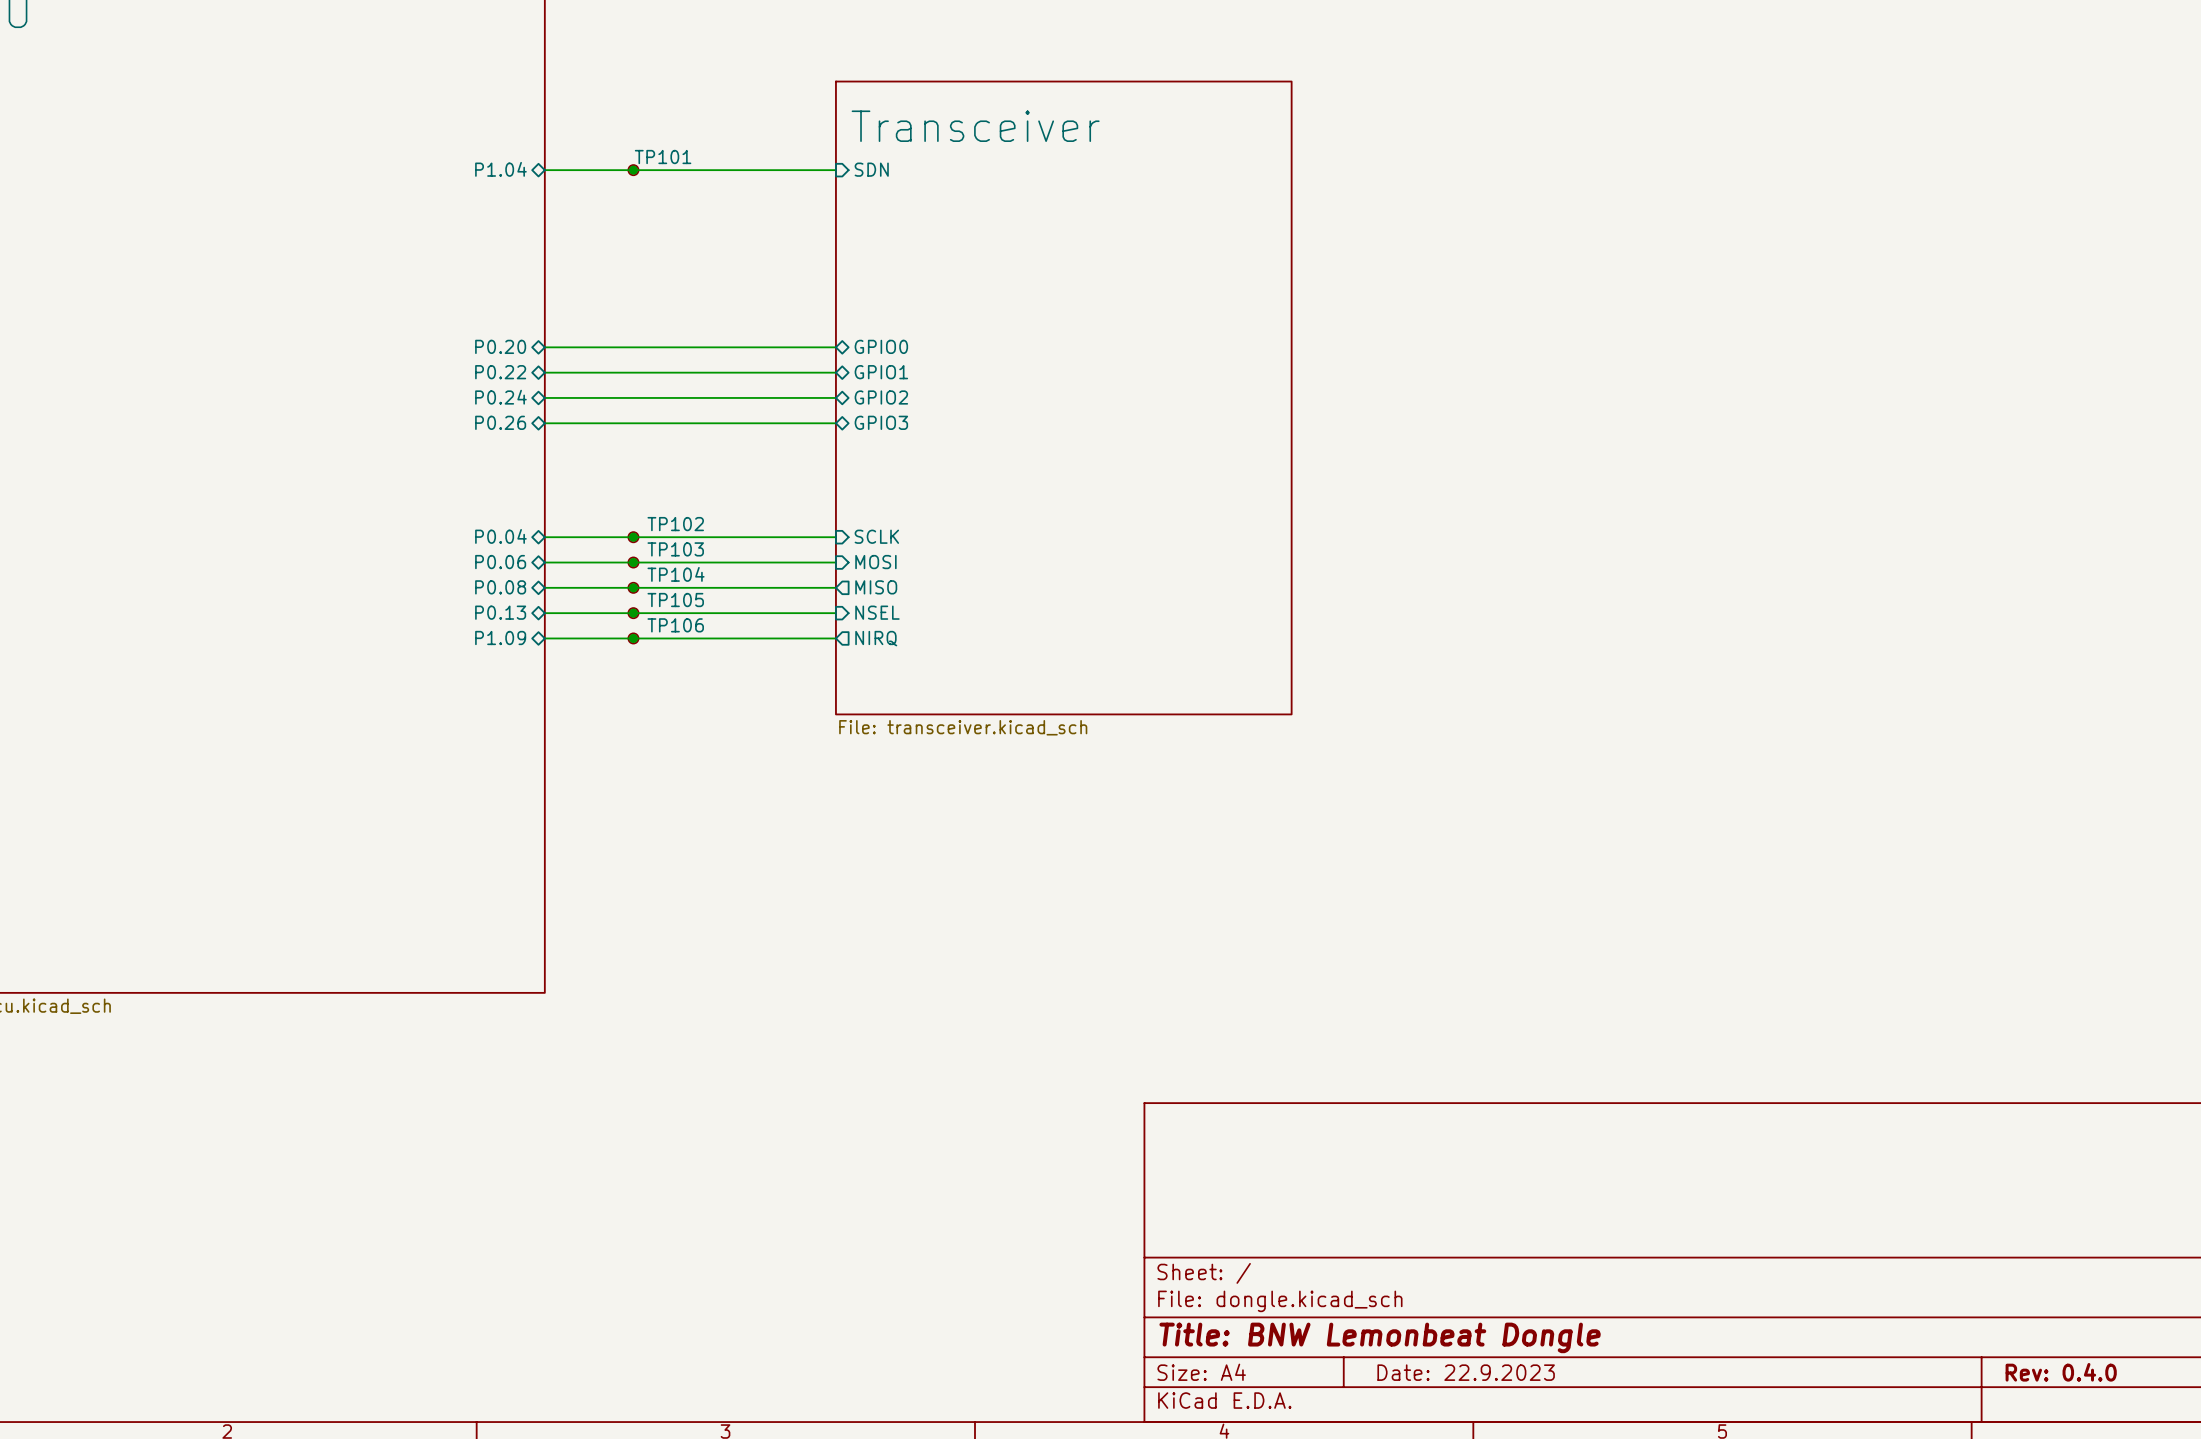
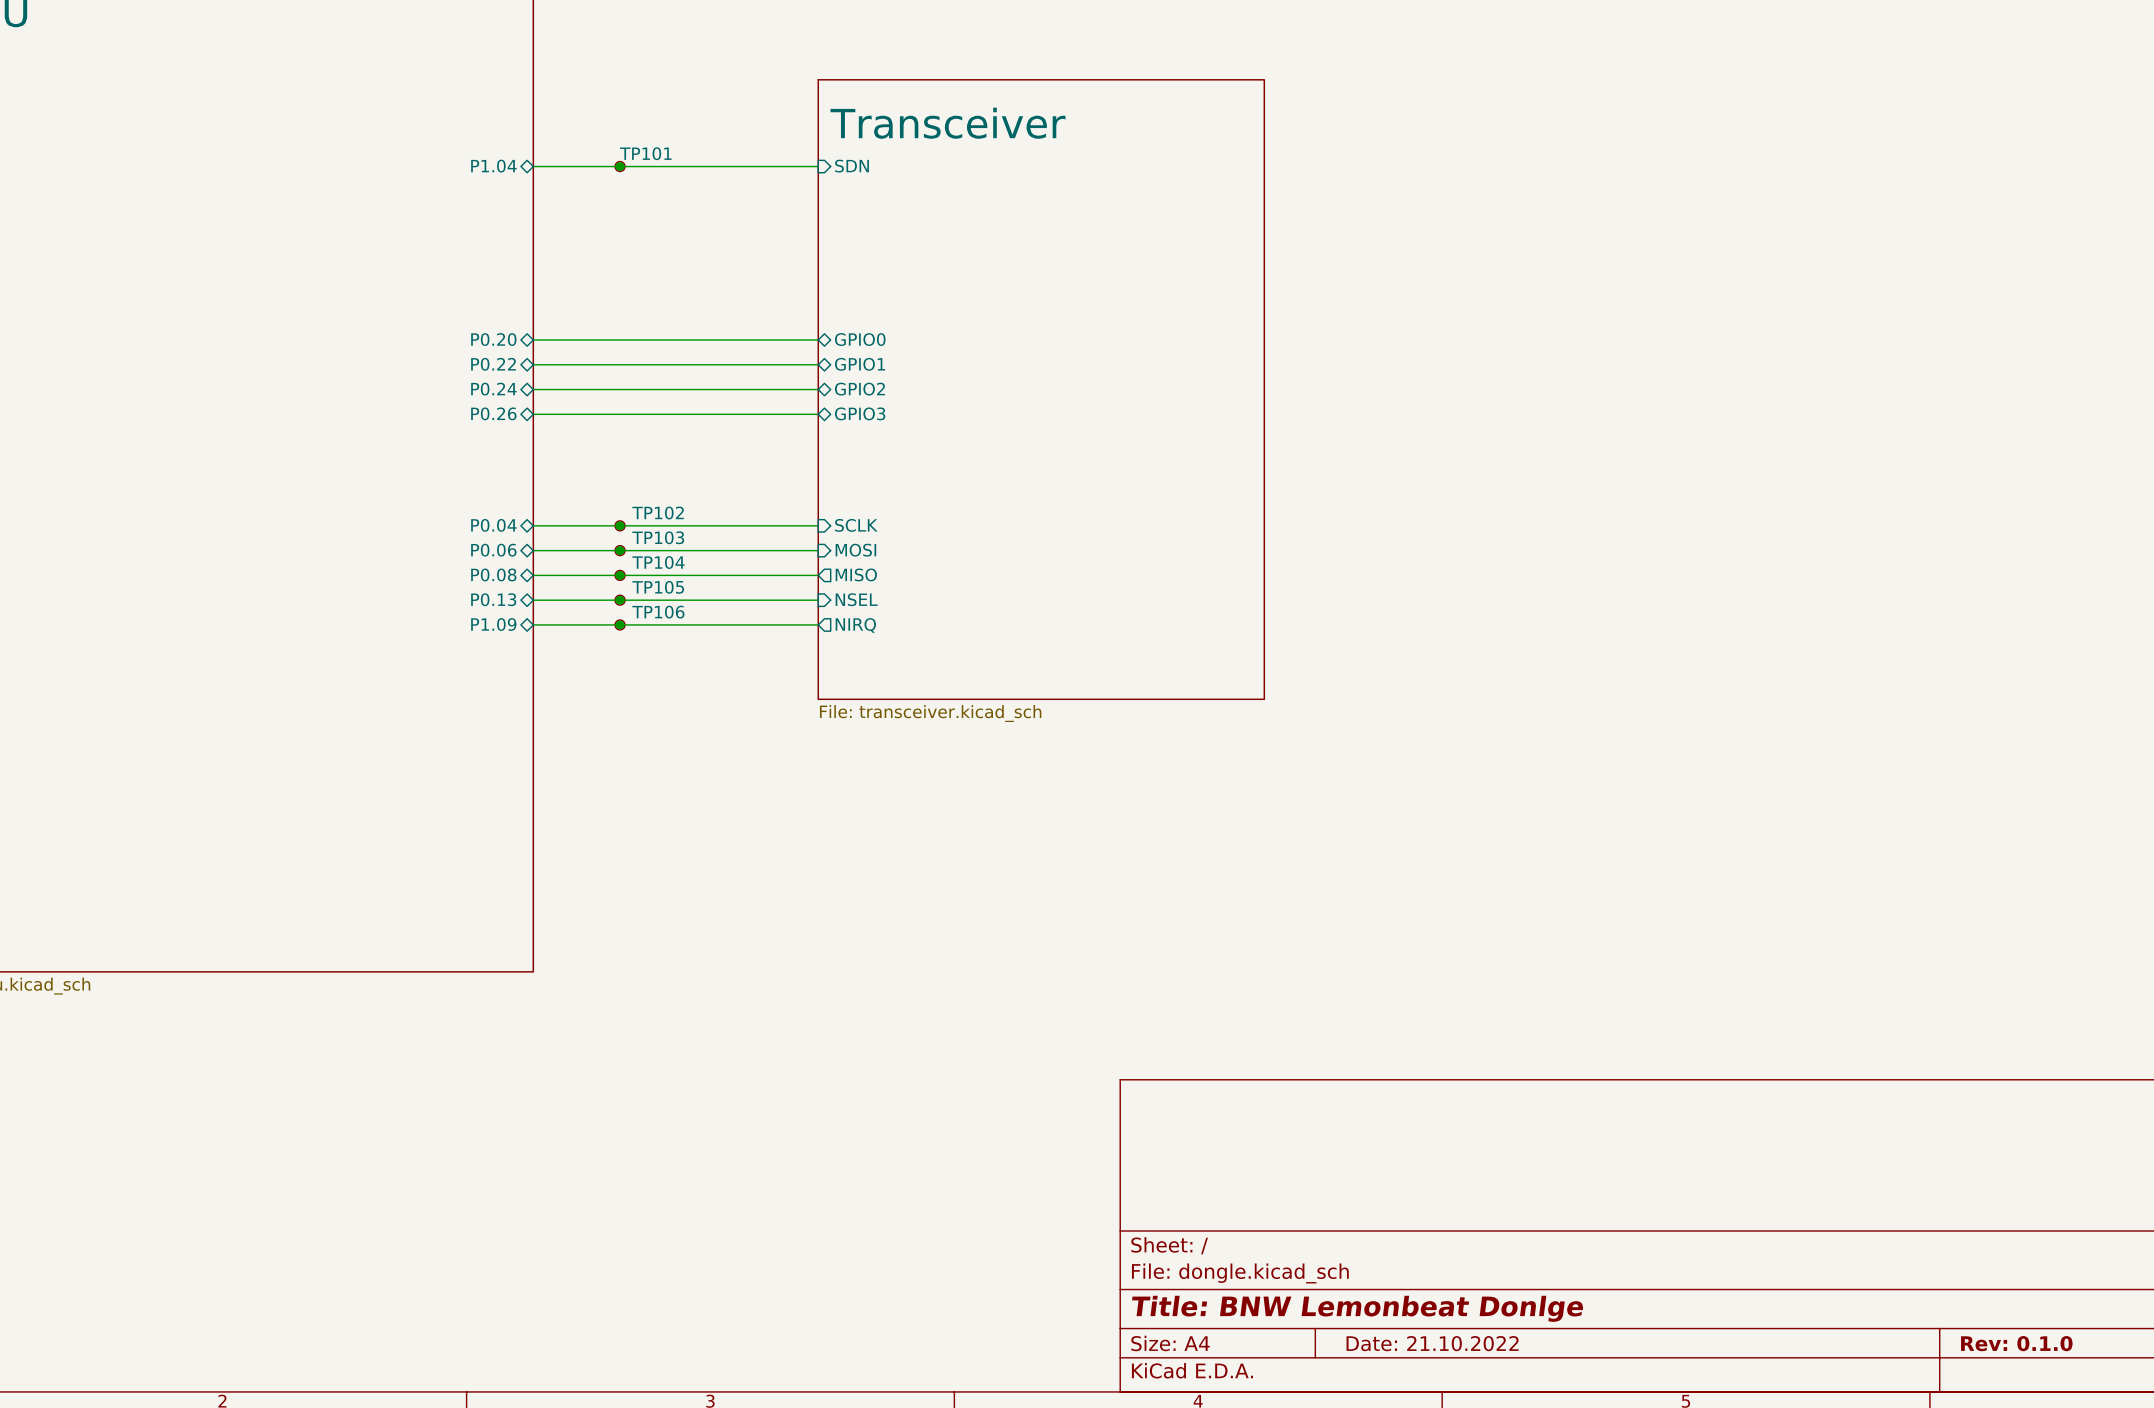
title block: Title: BNW Lemonbeat Dongle (1380, 1337) -> Title: BNW Lemonbeat Donlge (1357, 1308)
title block: Date: 22.9.2023 (1466, 1372) -> Date: 21.10.2022 (1432, 1343)
title block: Rev: 0.4.0 (2061, 1372) -> Rev: 0.1.0 (2016, 1343)

